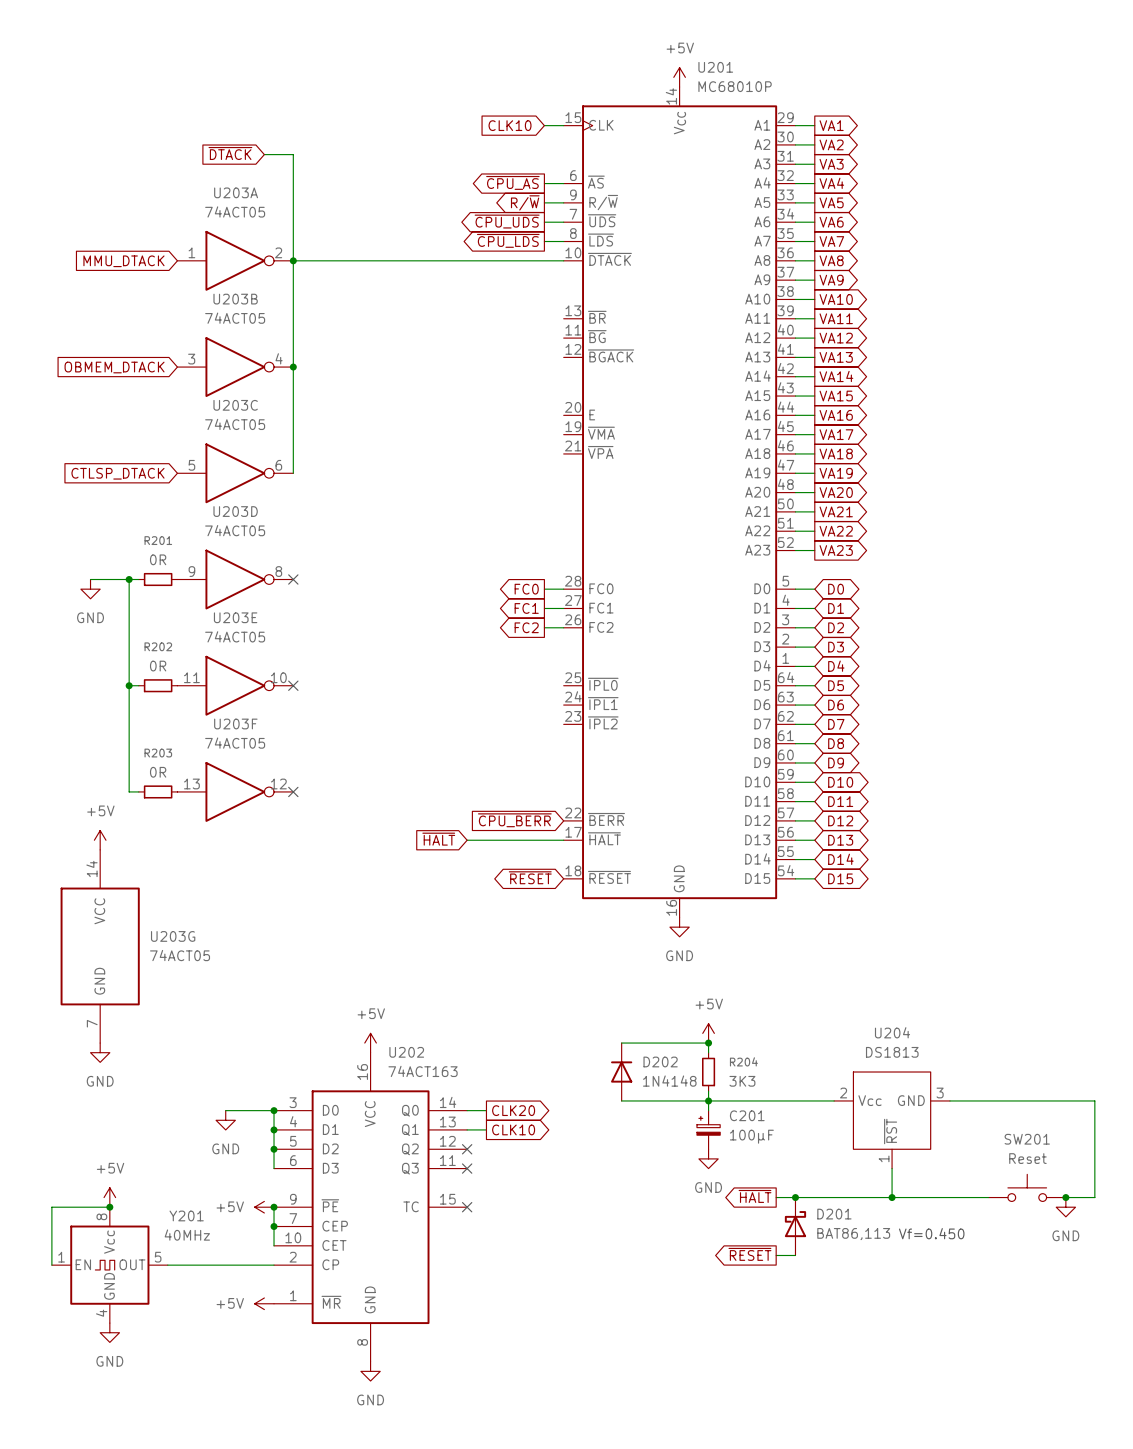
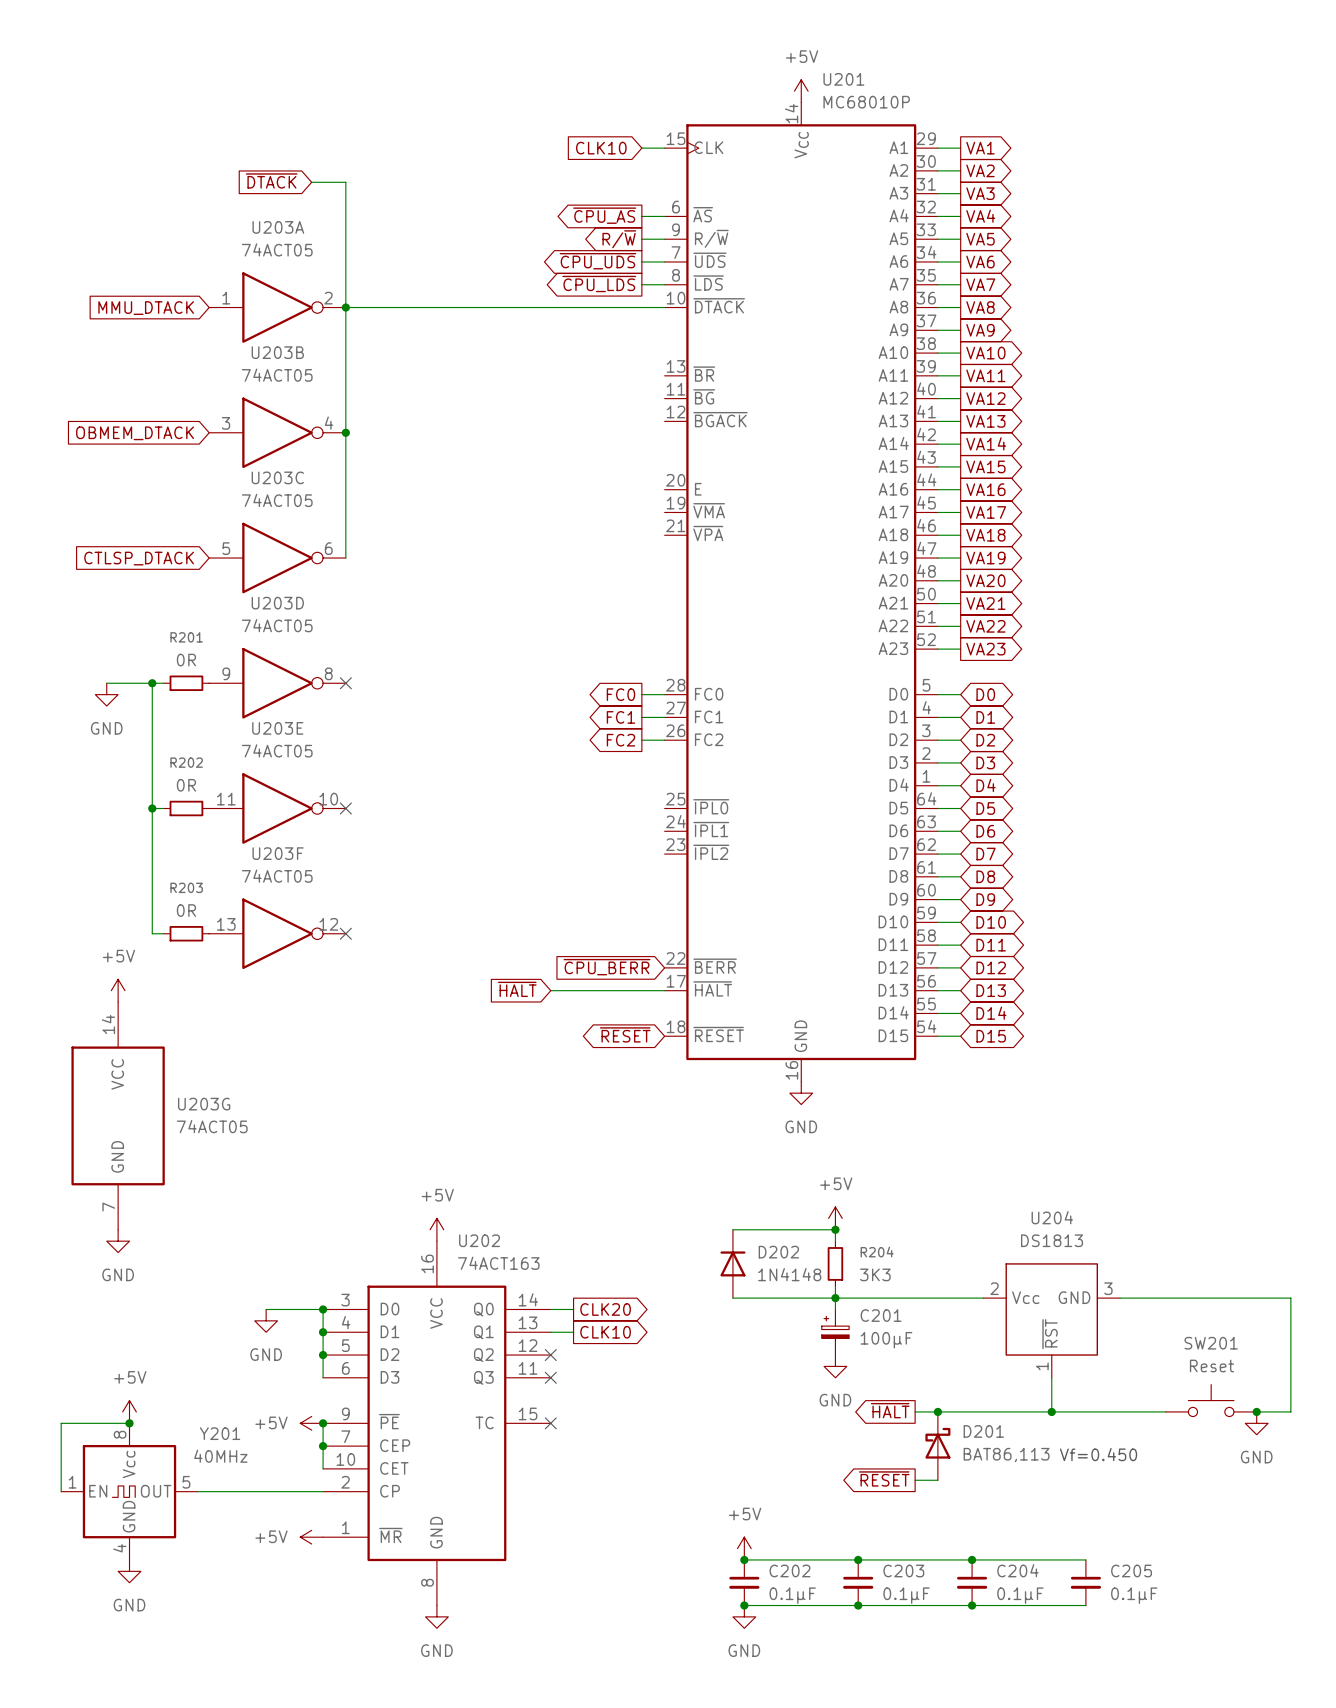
power symbol: none -> +5V (744, 1548)
wire: none -> (744, 1559) (1085, 1559)
junction: none -> (744, 1559)
junction: none -> (858, 1559)
junction: none -> (972, 1559)
C202: none -> 0.1µF (744, 1582)
C203: none -> 0.1µF (858, 1582)
C204: none -> 0.1µF (972, 1582)
C205: none -> 0.1µF (1085, 1582)
wire: none -> (744, 1605) (1085, 1605)
junction: none -> (744, 1605)
junction: none -> (858, 1605)
junction: none -> (972, 1605)
power symbol: none -> GND (744, 1616)

